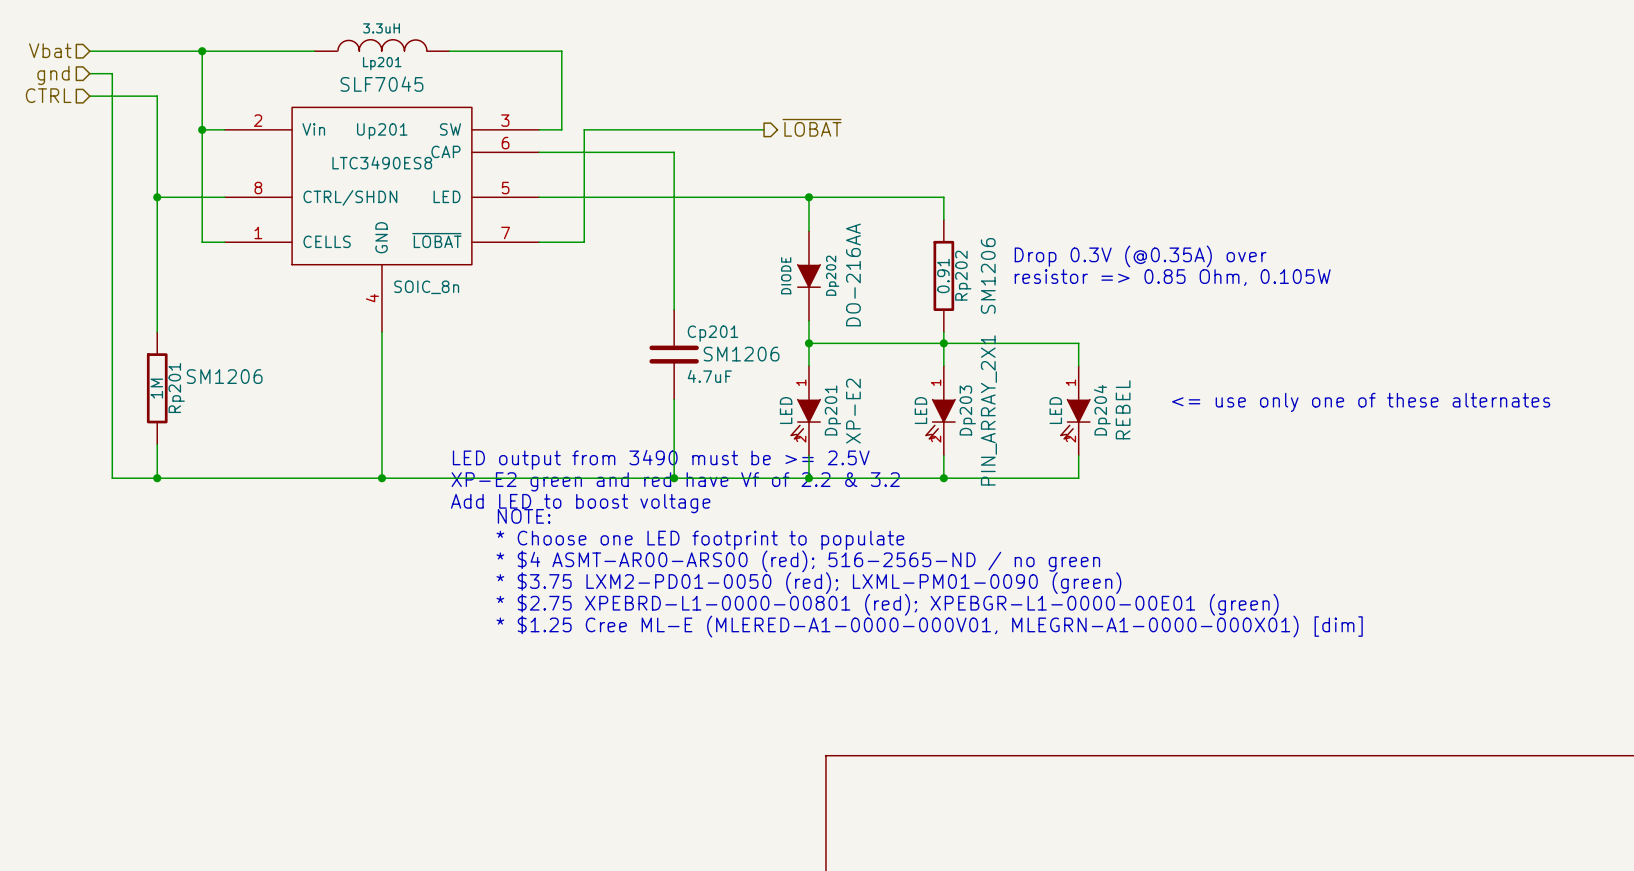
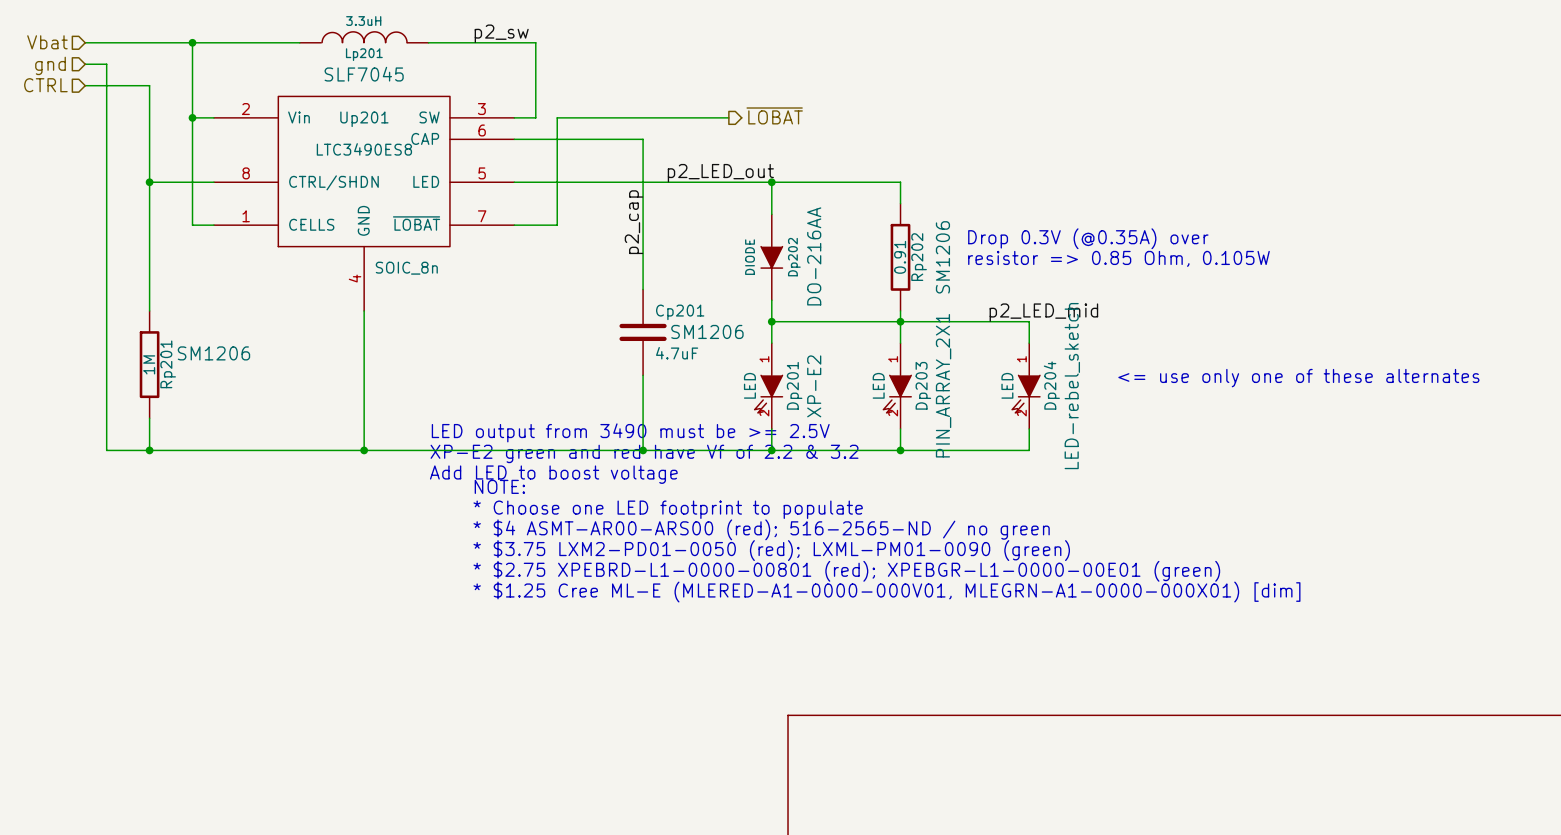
label: none -> p2_sw (501, 33)
label: none -> p2_LED_out (720, 173)
label: none -> p2_cap (633, 222)
label: none -> p2_LED_mid (1043, 312)
Dp204 text: REBEL (1123, 409) -> LED-rebel_sketch (1072, 386)

